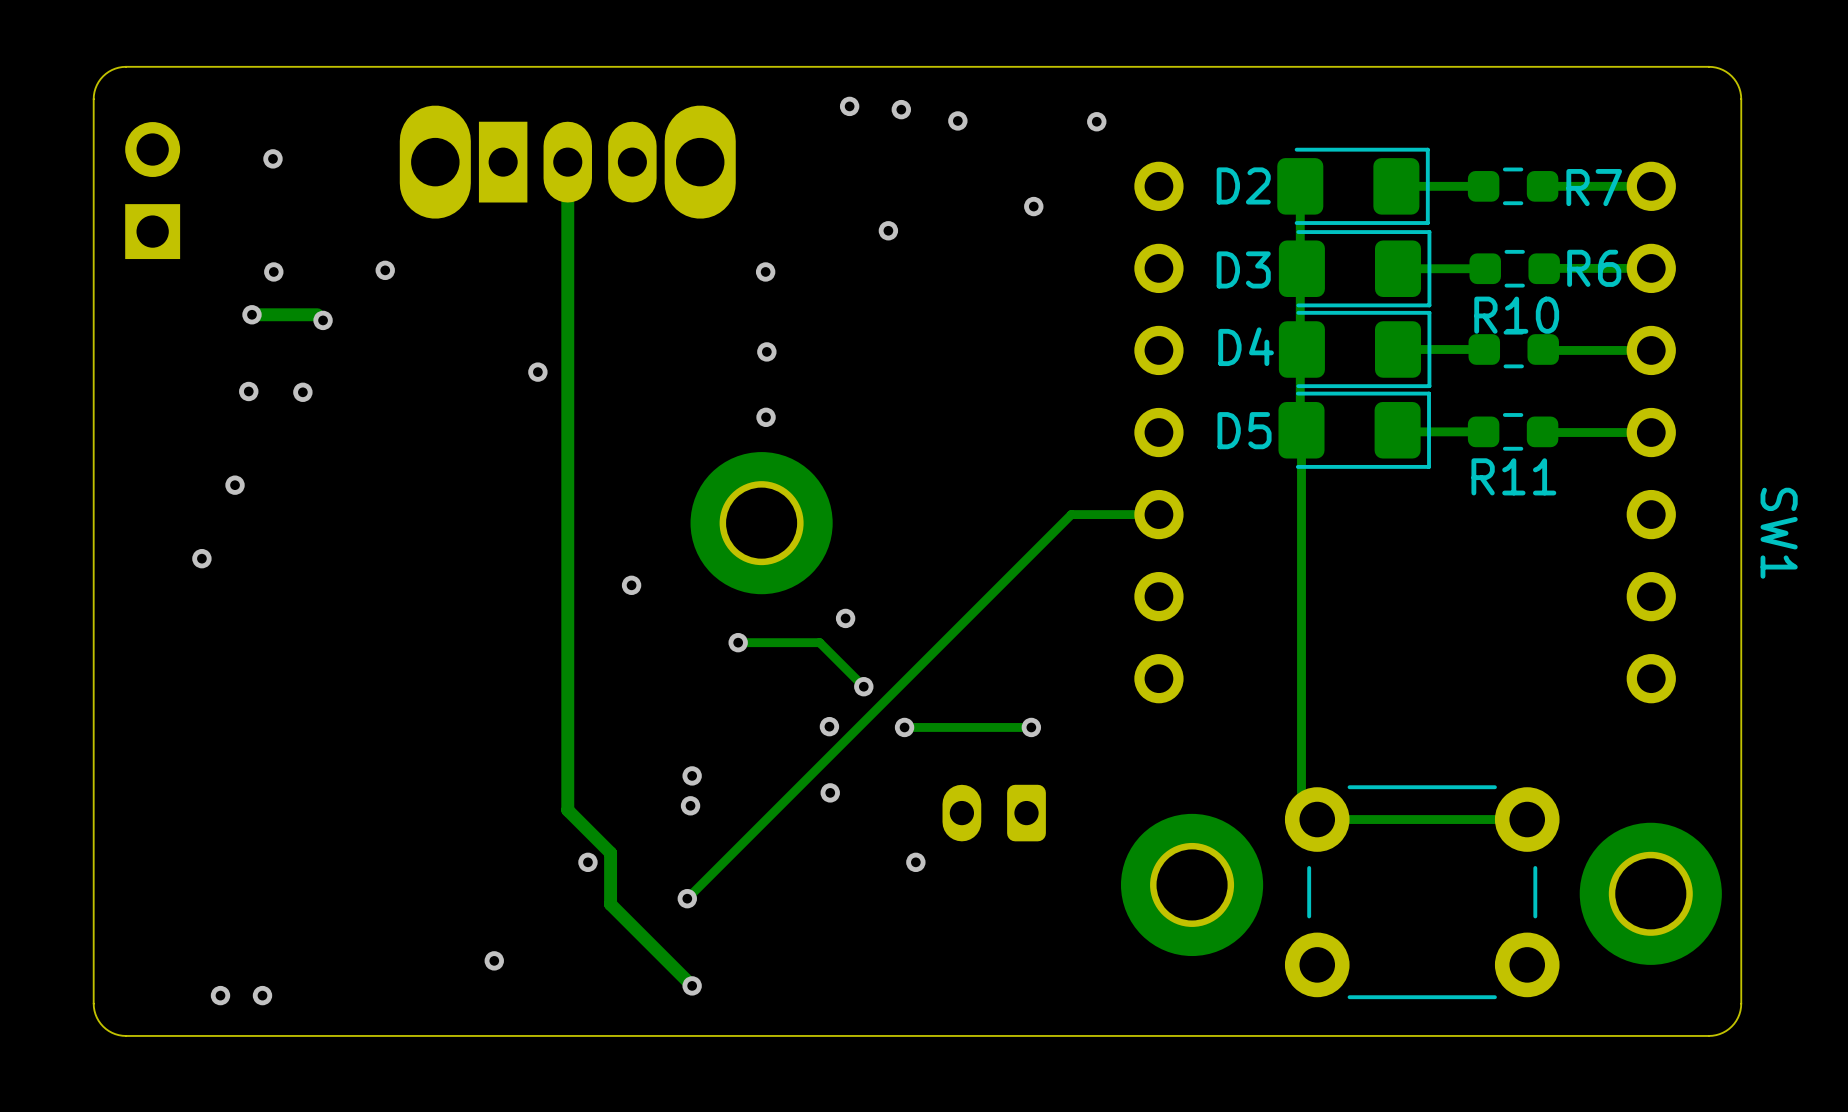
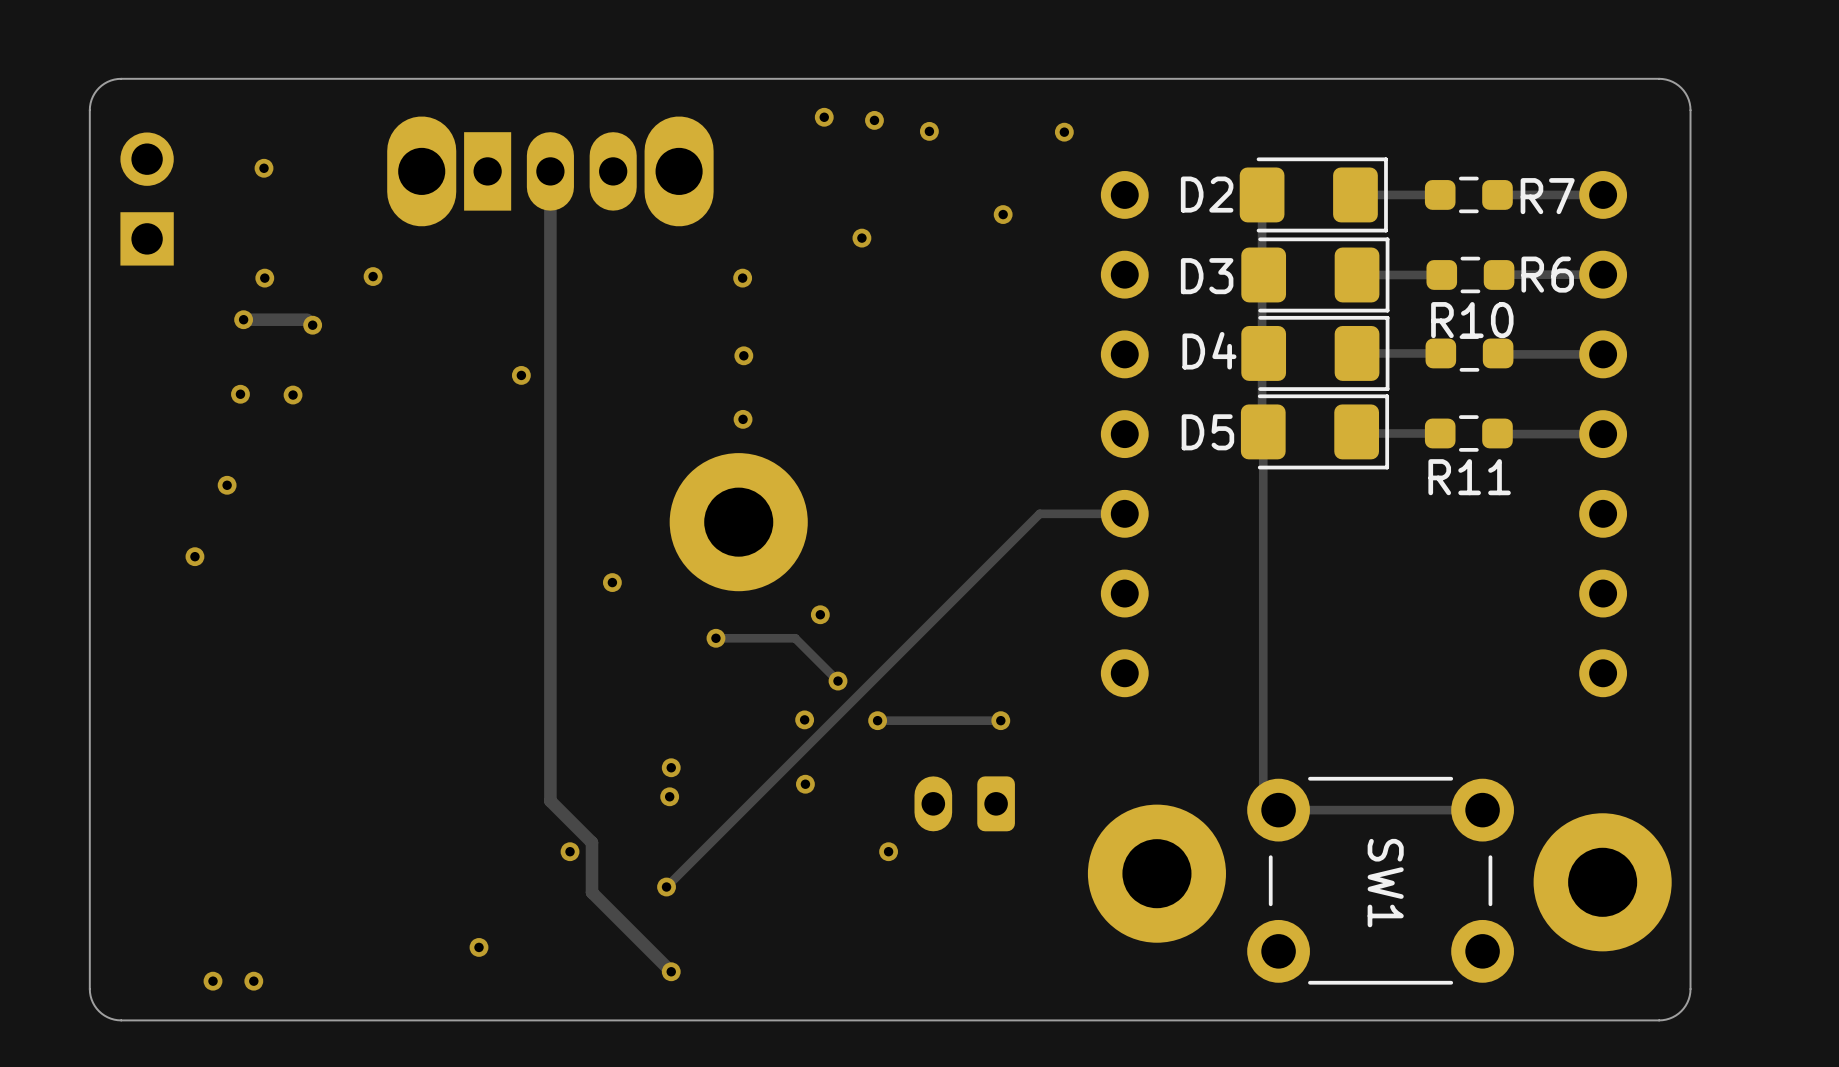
SW1 name position: SW1 (1779, 533) -> SW1 (1385, 883)

